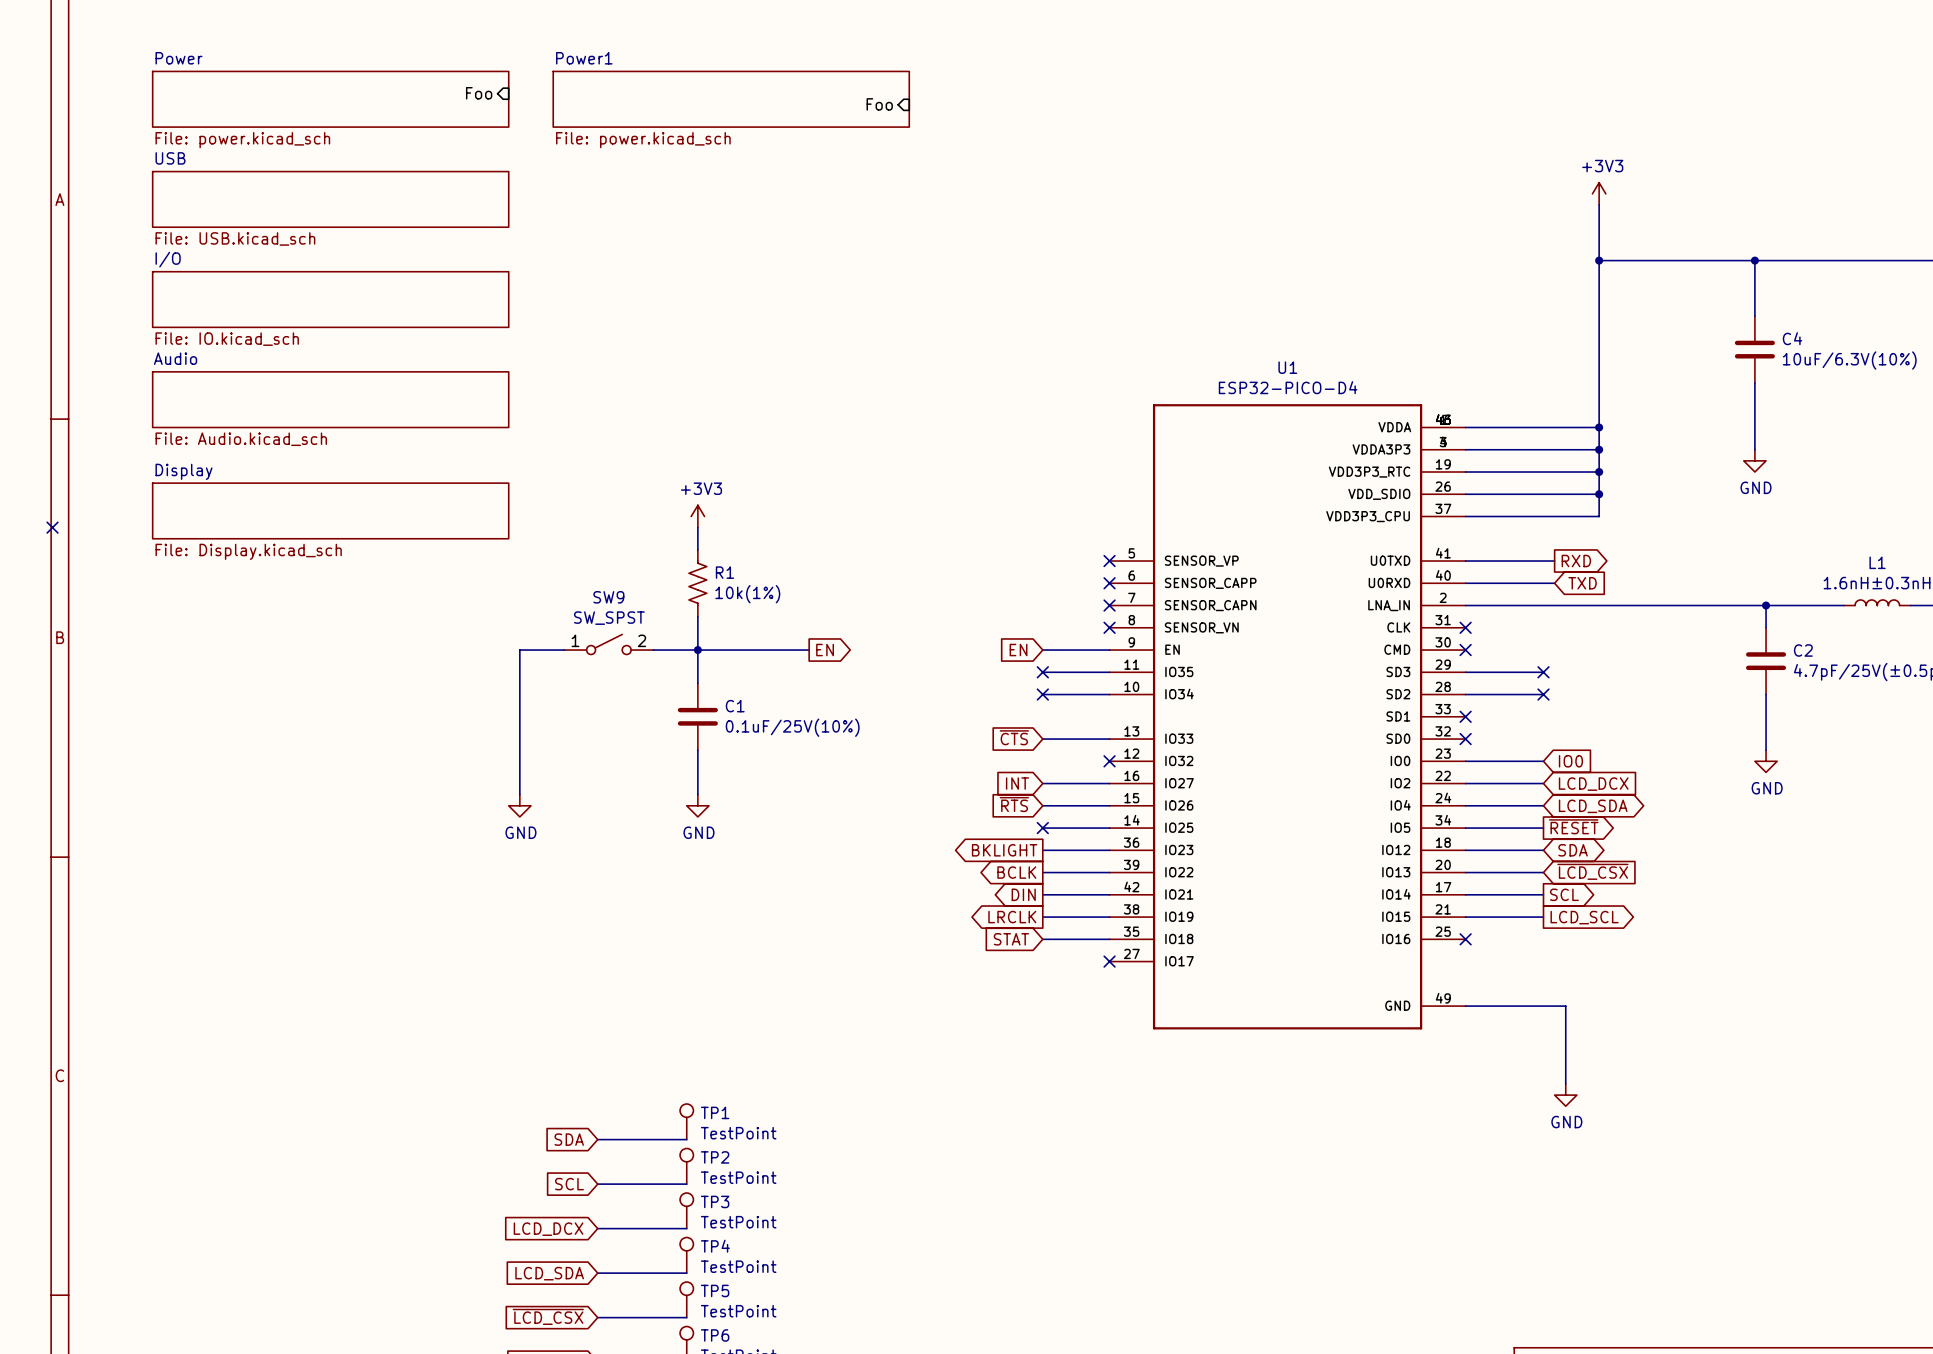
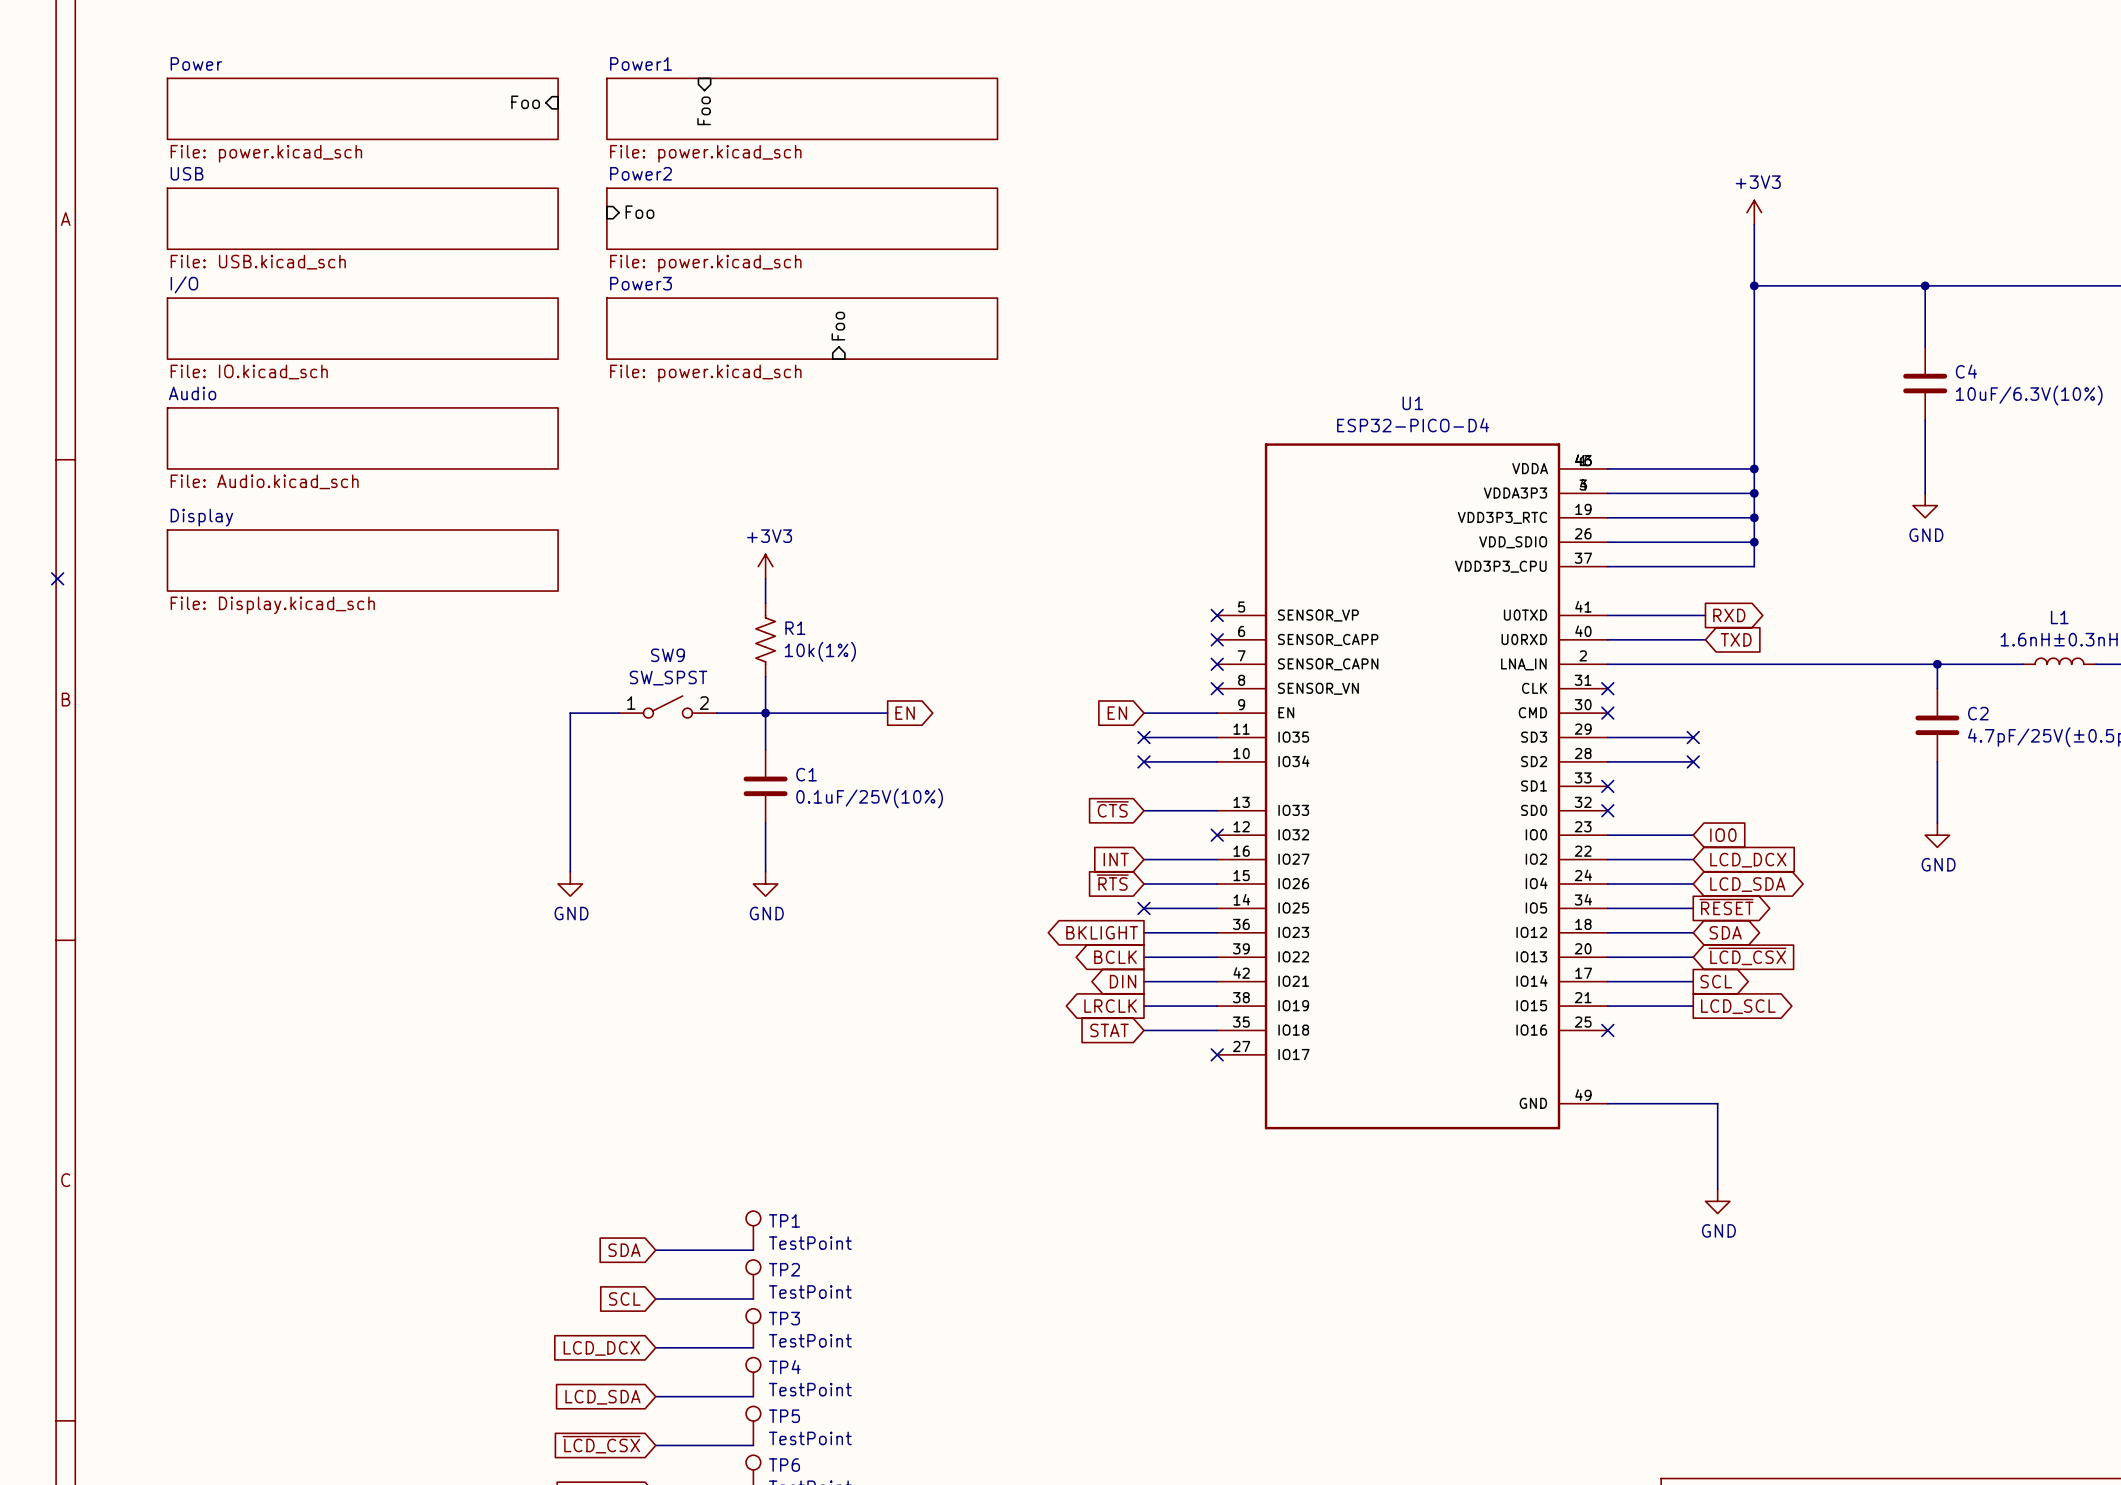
sheet pin: none -> Foo (704, 110)
sheet pin: Foo (879, 104) -> none
sheet pin: none -> Foo (639, 212)
sheet Power2: none -> File: power.kicad_sch (802, 218)
sheet pin: none -> Foo (838, 326)
sheet Power3: none -> File: power.kicad_sch (802, 328)

